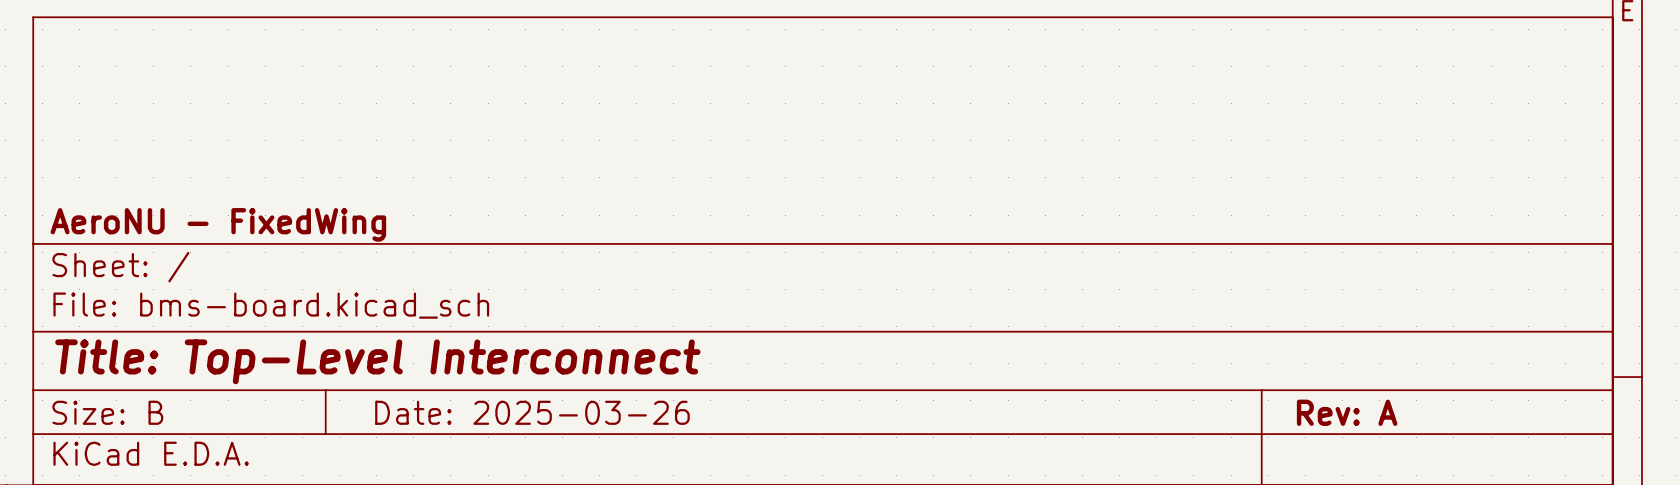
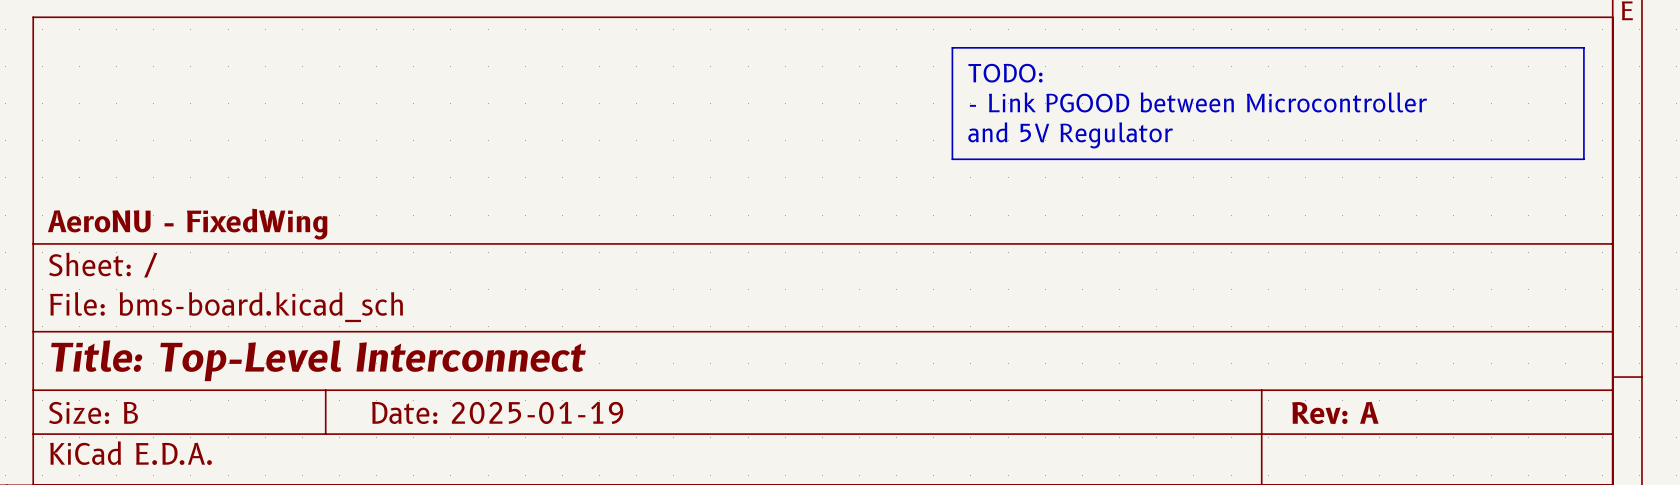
line: none -> (952, 47) (1583, 47) (1583, 159) (952, 159) (952, 47)
text: none -> TODO: (1005, 73)
text: none -> - Link PGOOD between Microcontroller (1198, 102)
text: none -> and 5V Regulator (1070, 135)
title block: Date: 2025-03-26 (532, 412) -> Date: 2025-01-19 (497, 412)

